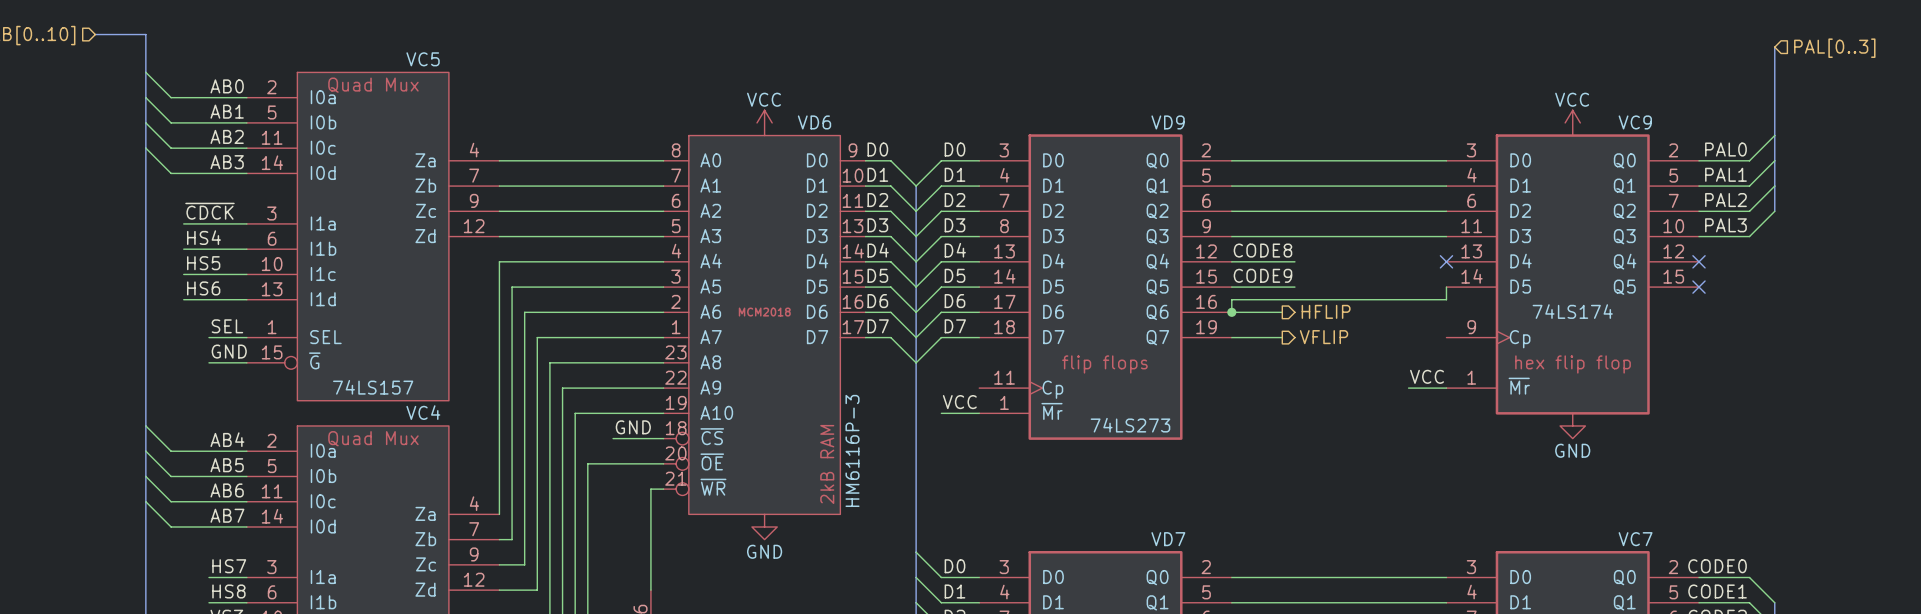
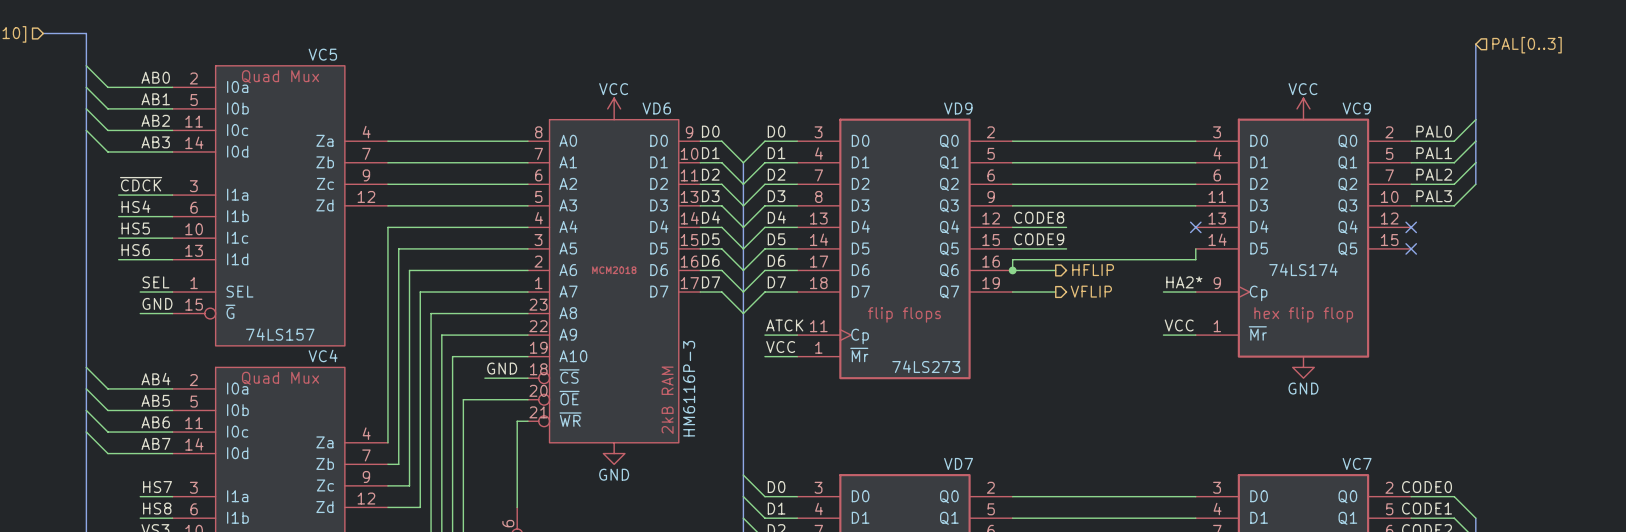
label: none -> HA2* (1184, 282)
wire: none -> (1163, 292) (1195, 292)
label: none -> ATCK (784, 325)
wire: none -> (764, 335) (797, 335)

